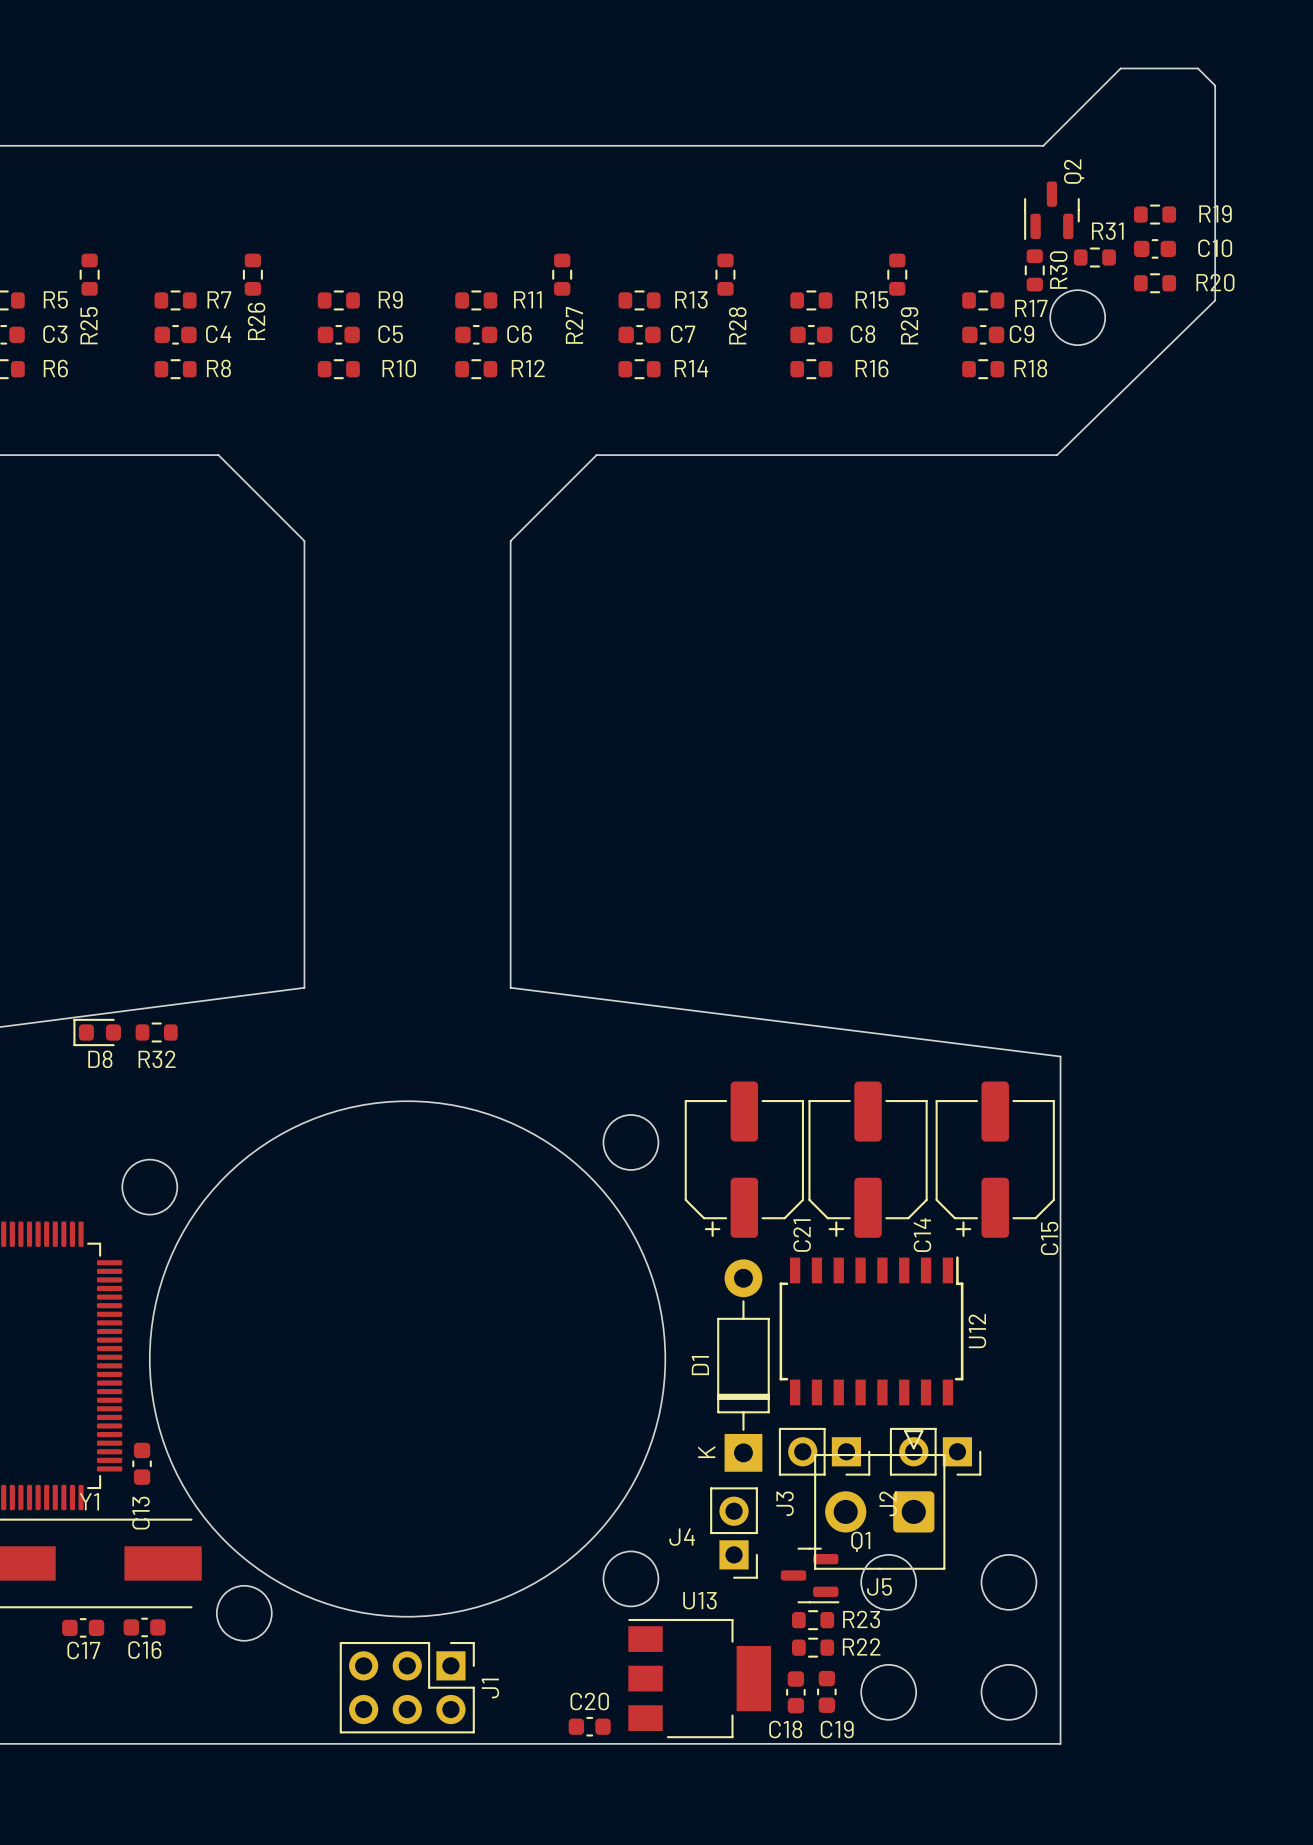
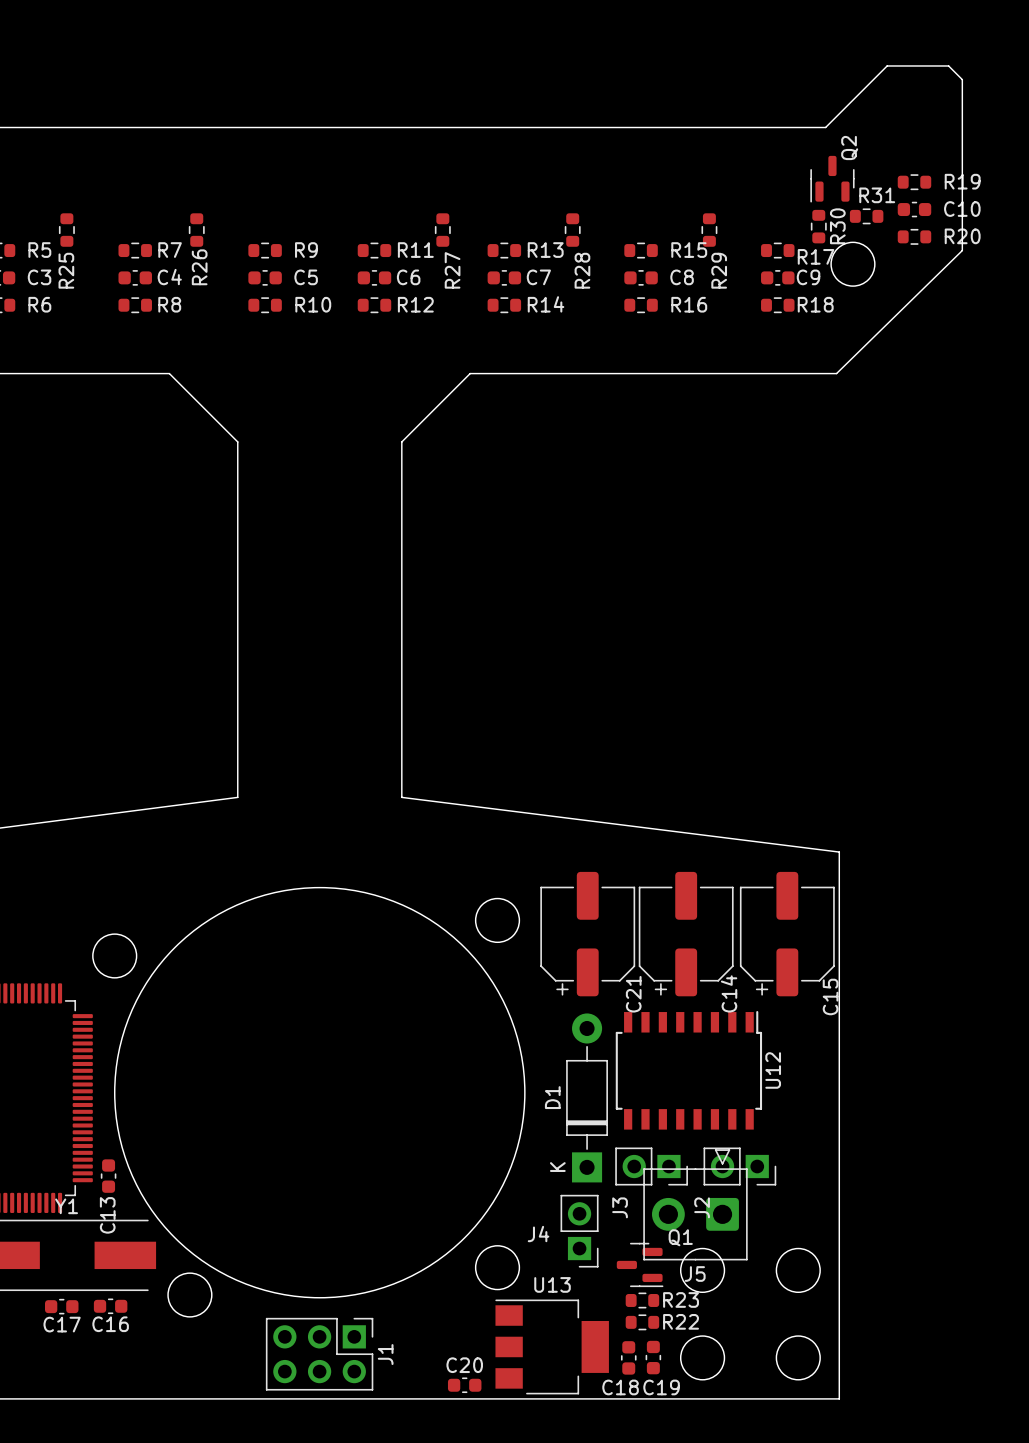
D8: (97, 1032) -> none
R32: (156, 1032) -> none

